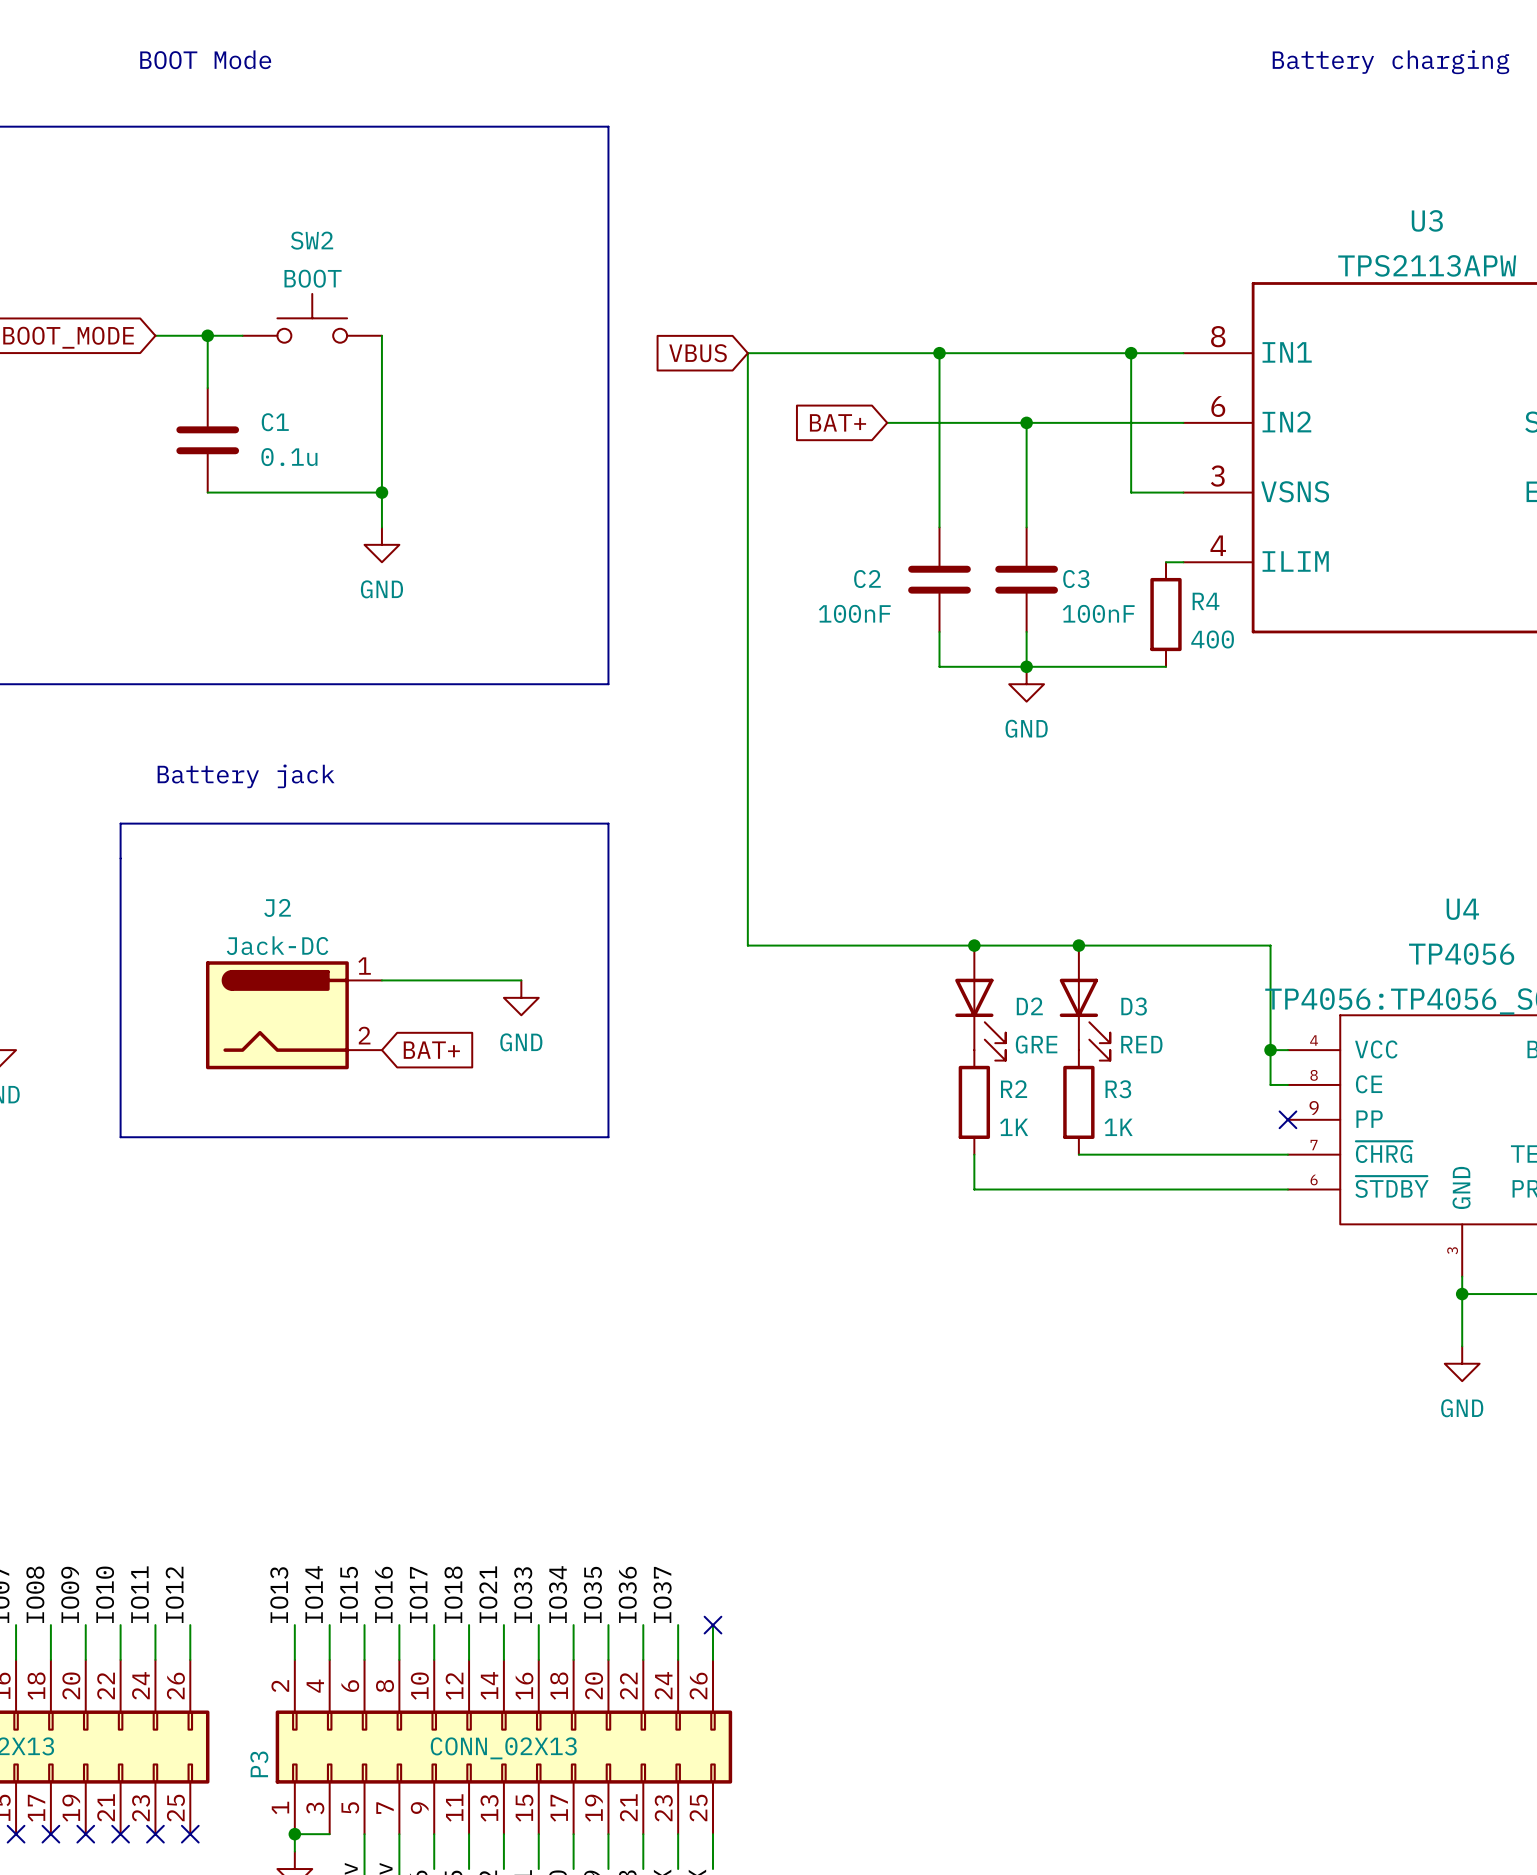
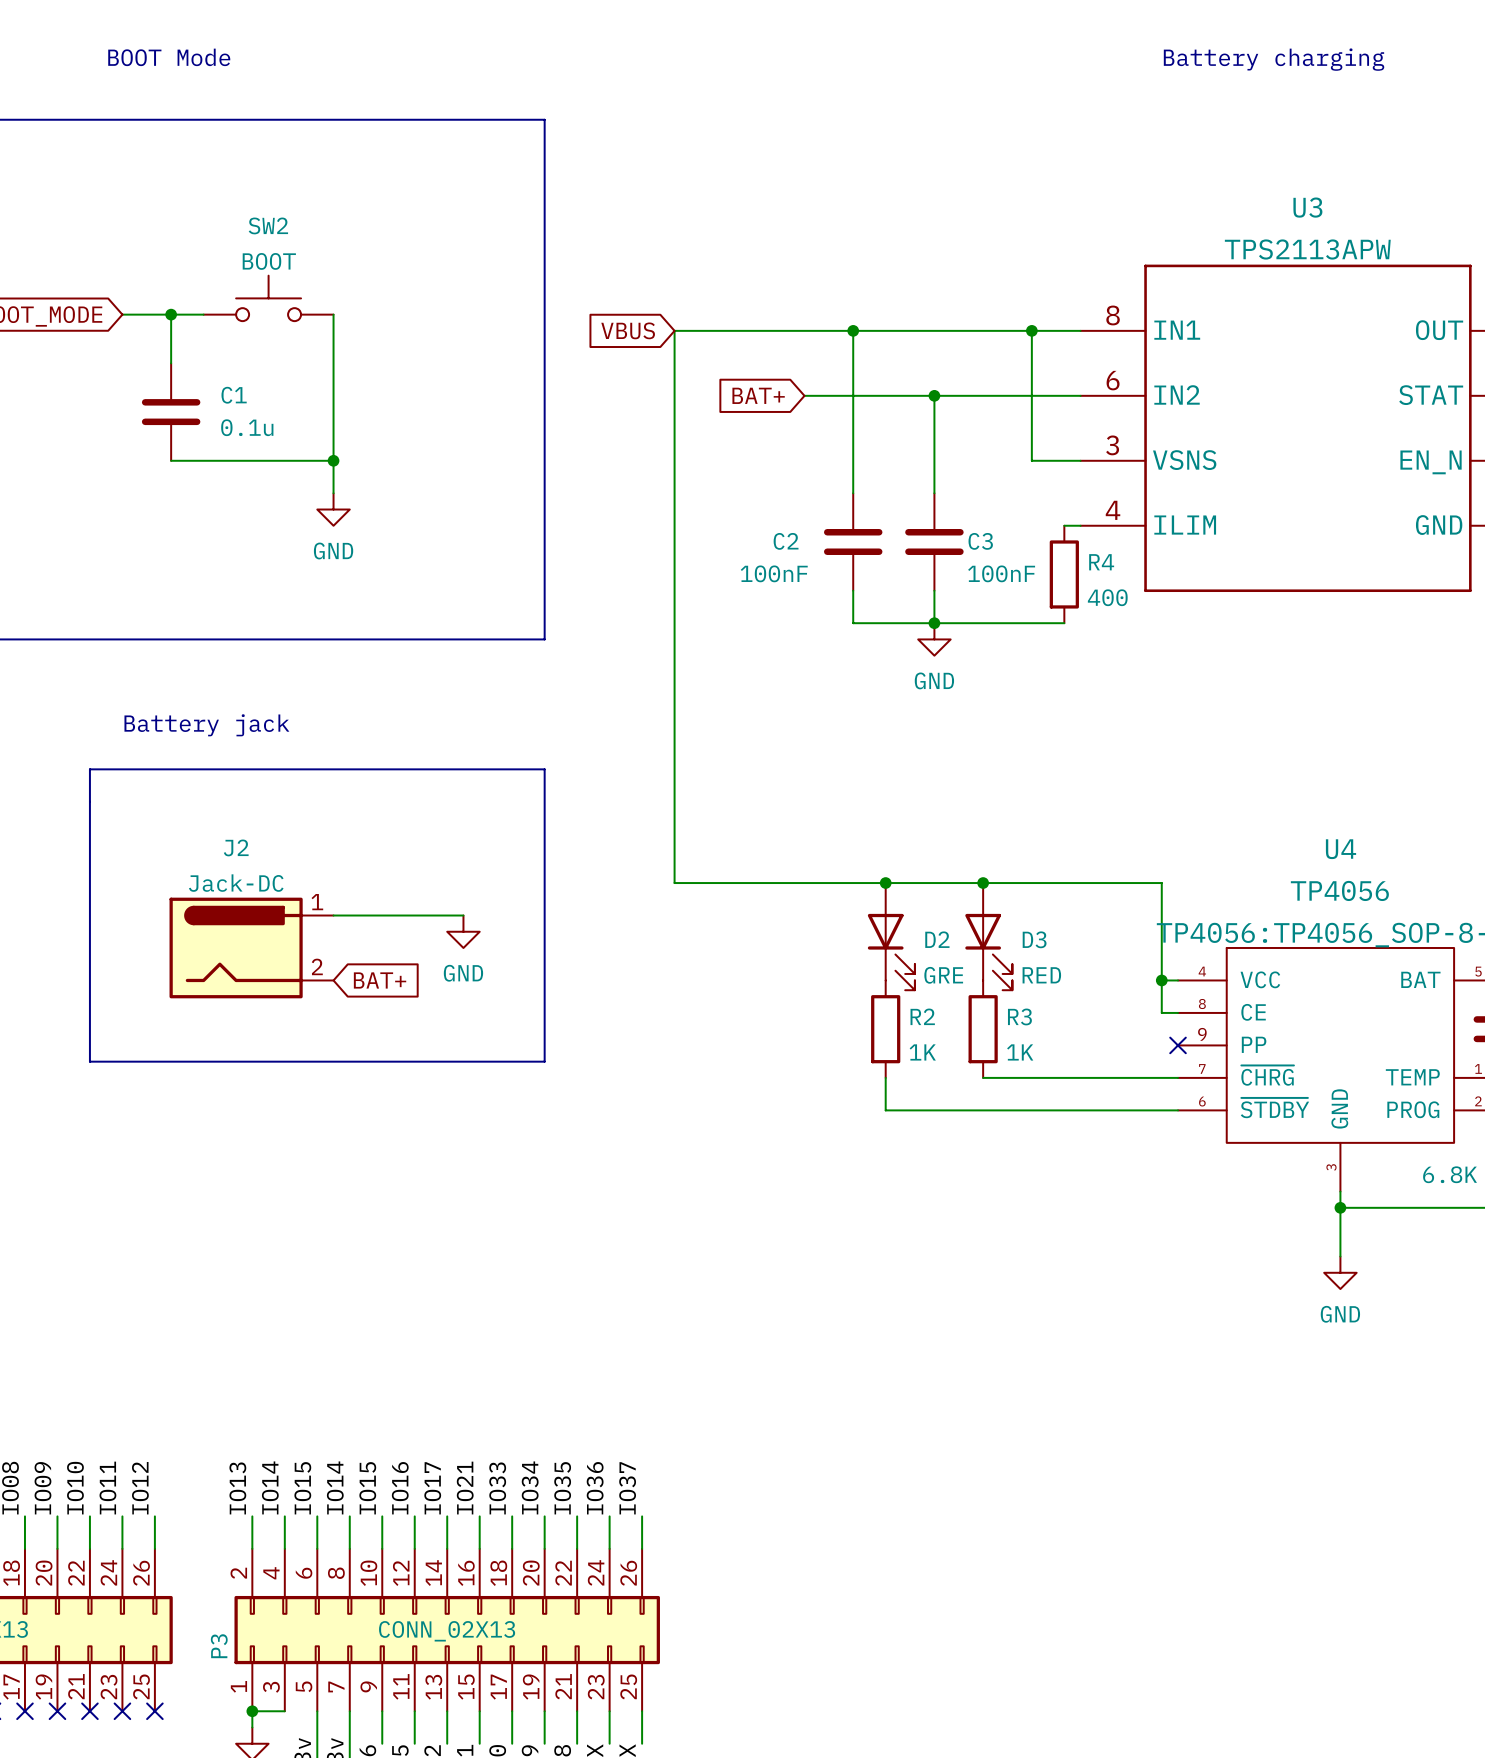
label: IO16 (383, 1594) -> IO14 (335, 1487)
label: IO17 (418, 1594) -> IO15 (367, 1488)
label: IO18 (453, 1594) -> IO16 (400, 1488)
label: IO21 (488, 1594) -> IO17 (432, 1488)
label: IO34 (558, 1594) -> IO33 (497, 1488)
label: IO35 (592, 1594) -> IO34 (530, 1487)
label: IO36 (627, 1594) -> IO35 (562, 1488)
label: IO37 (662, 1594) -> IO36 (595, 1488)
label: none -> IO37 (627, 1488)
label: IO33 (523, 1595) -> IO21 (465, 1488)
no-connect mark: (712, 1625) -> none

